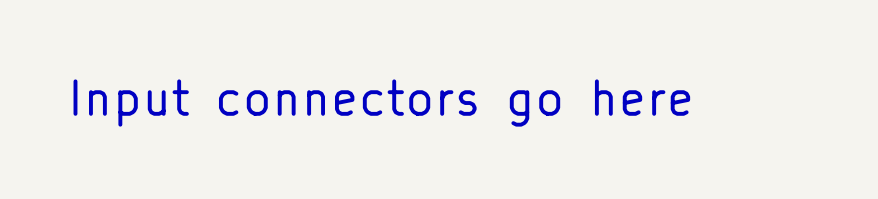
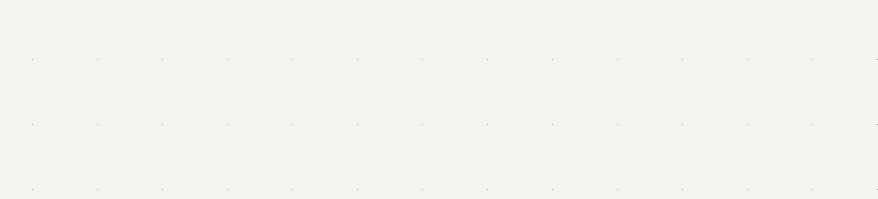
text: Input connectors go here (381, 103) -> none

